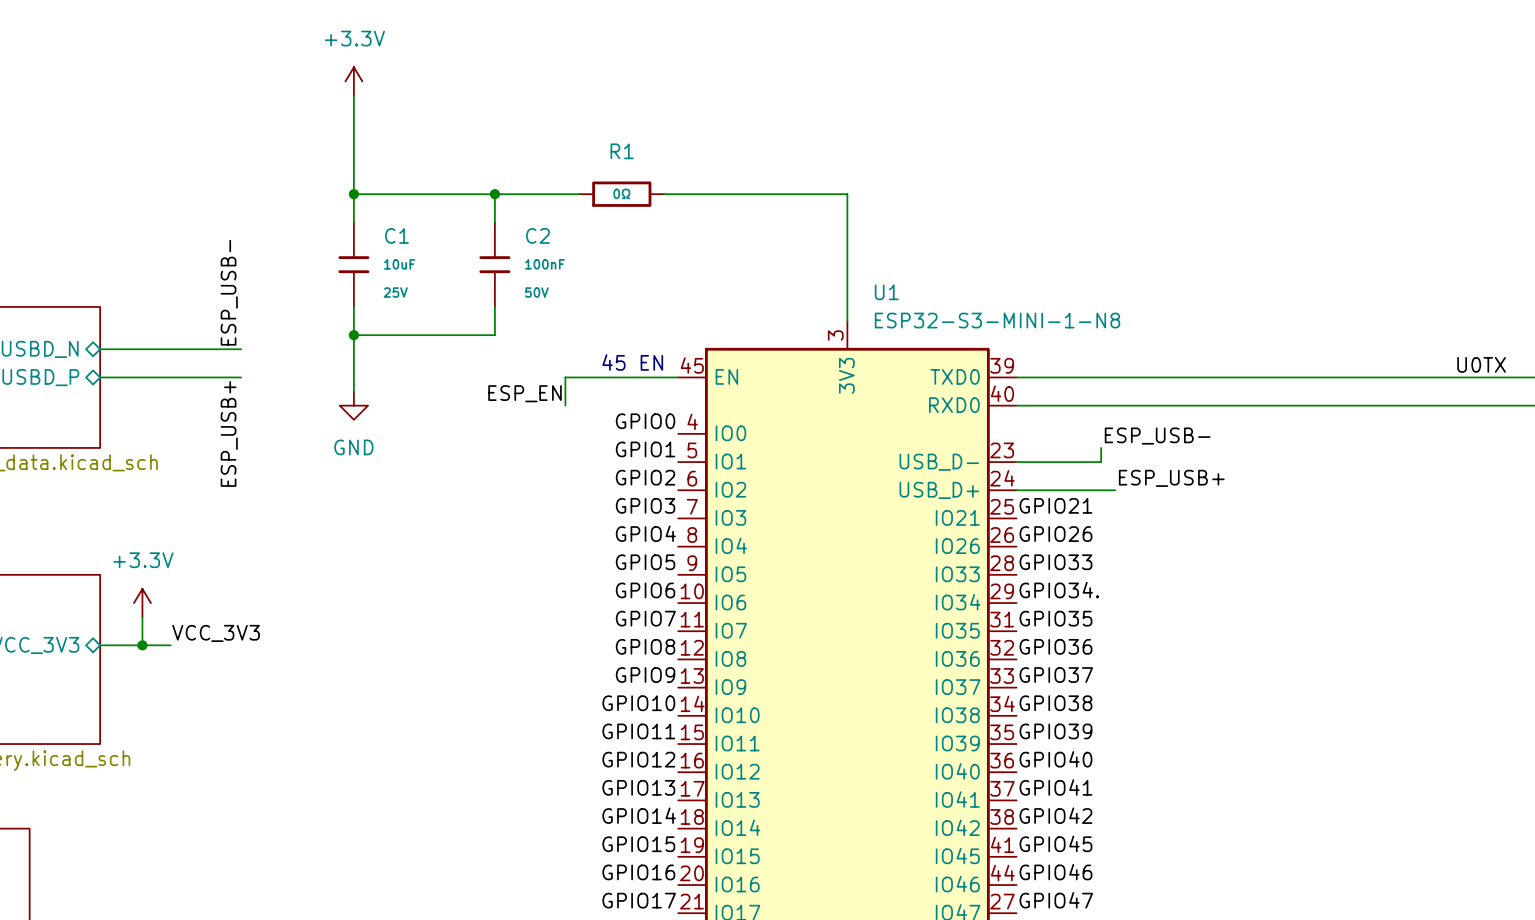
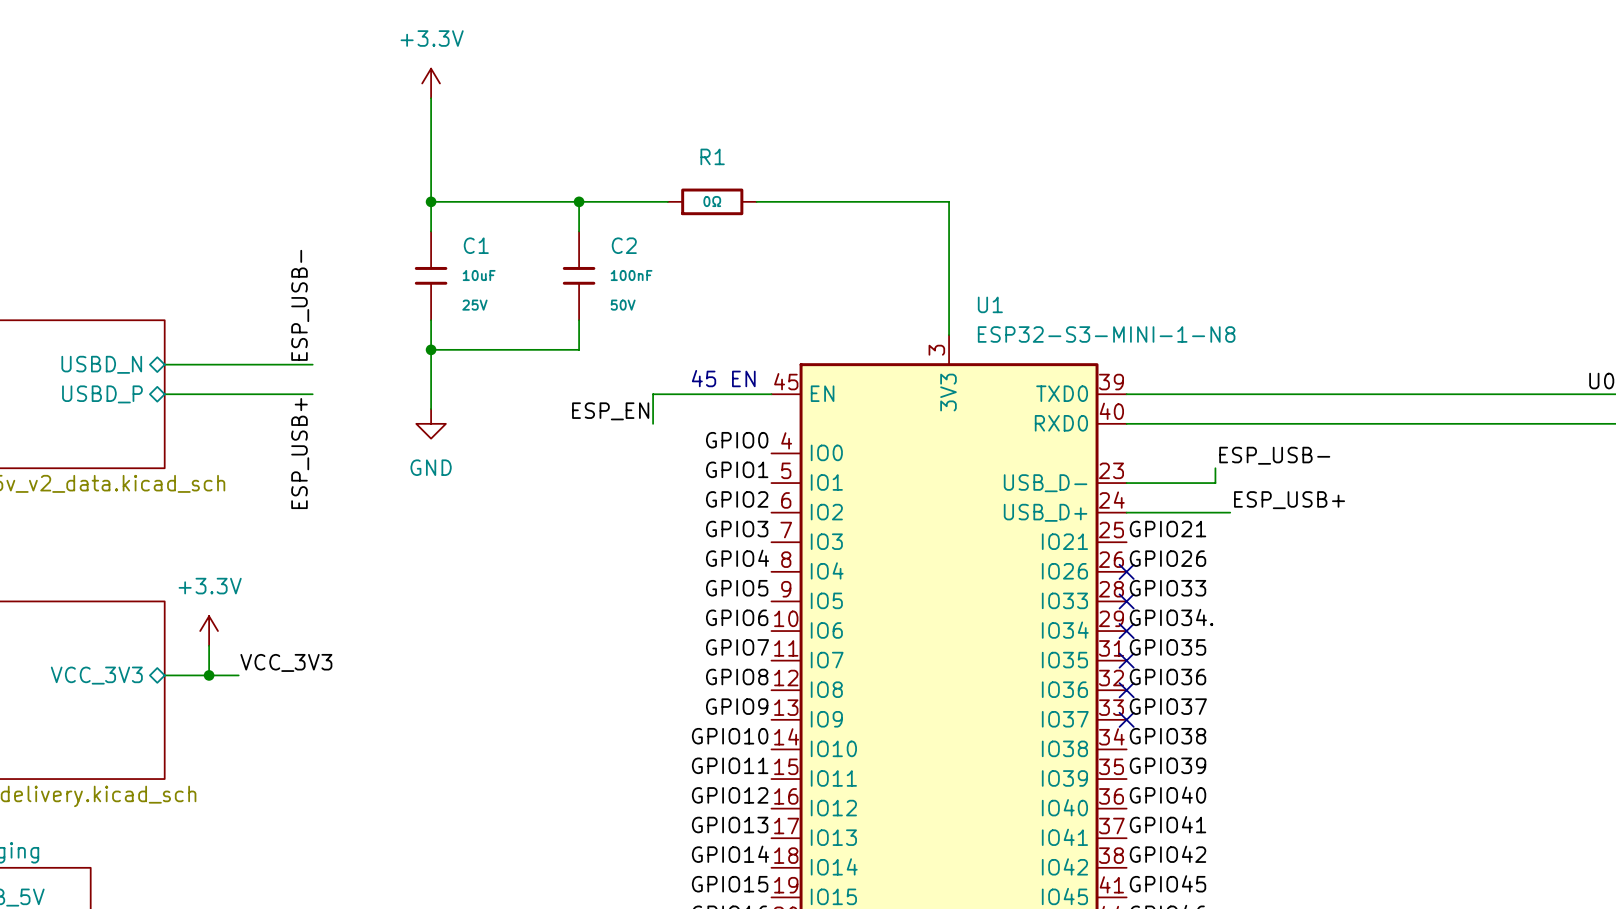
no-connect mark: none -> (1126, 571)
no-connect mark: none -> (1126, 601)
no-connect mark: none -> (1126, 631)
no-connect mark: none -> (1126, 660)
no-connect mark: none -> (1126, 690)
no-connect mark: none -> (1126, 719)

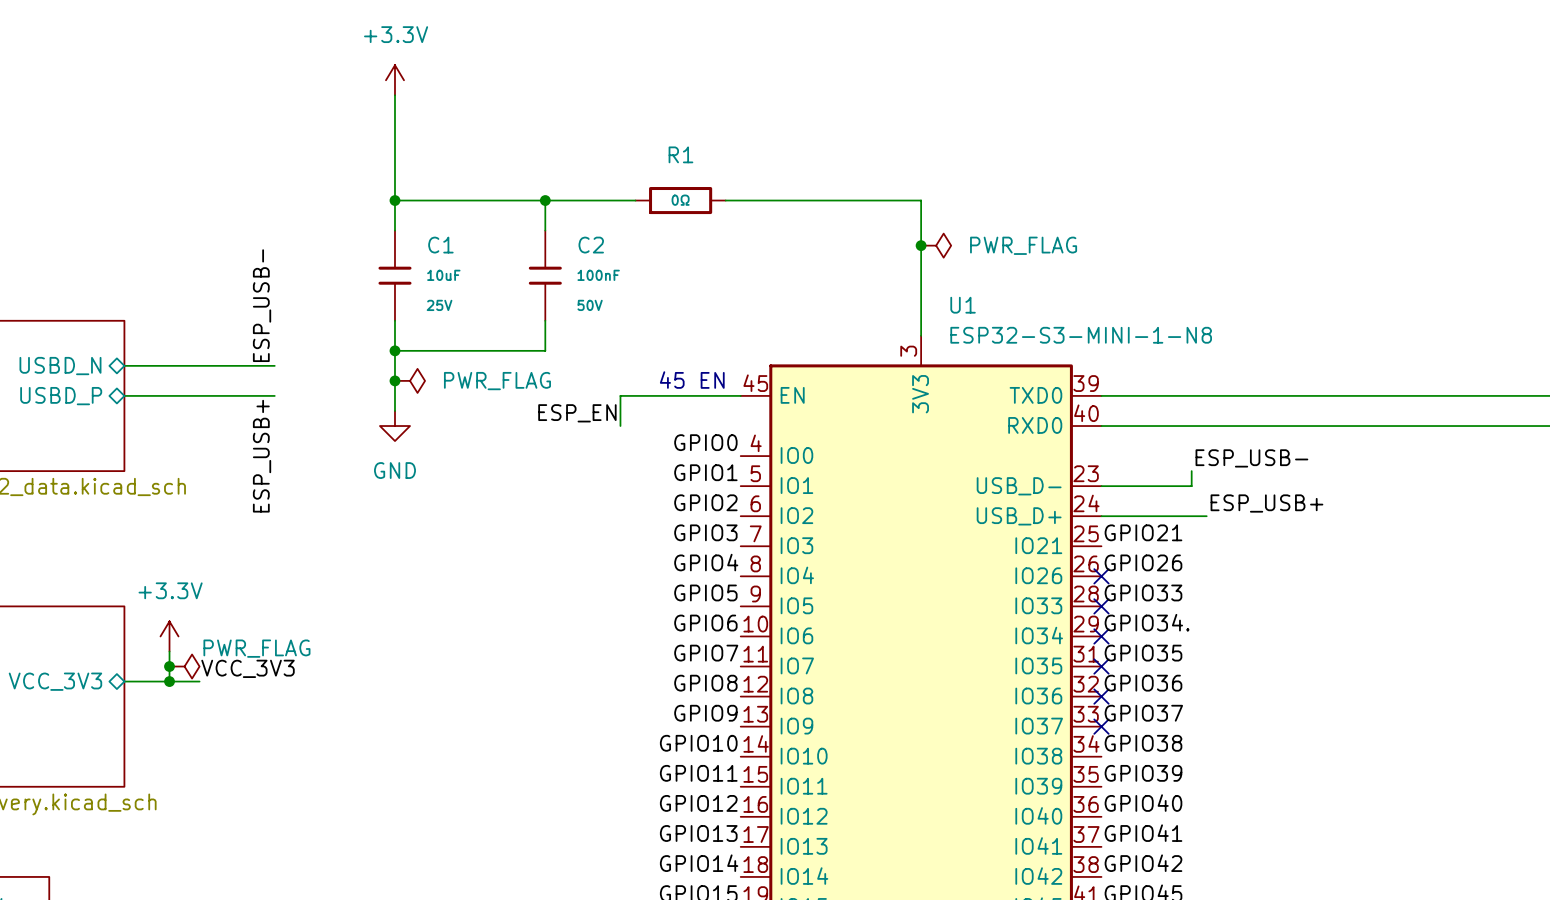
junction: none -> (921, 245)
power symbol: none -> PWR_FLAG (936, 245)
junction: none -> (394, 380)
power symbol: none -> PWR_FLAG (410, 380)
junction: none -> (169, 666)
power symbol: none -> PWR_FLAG (184, 666)

